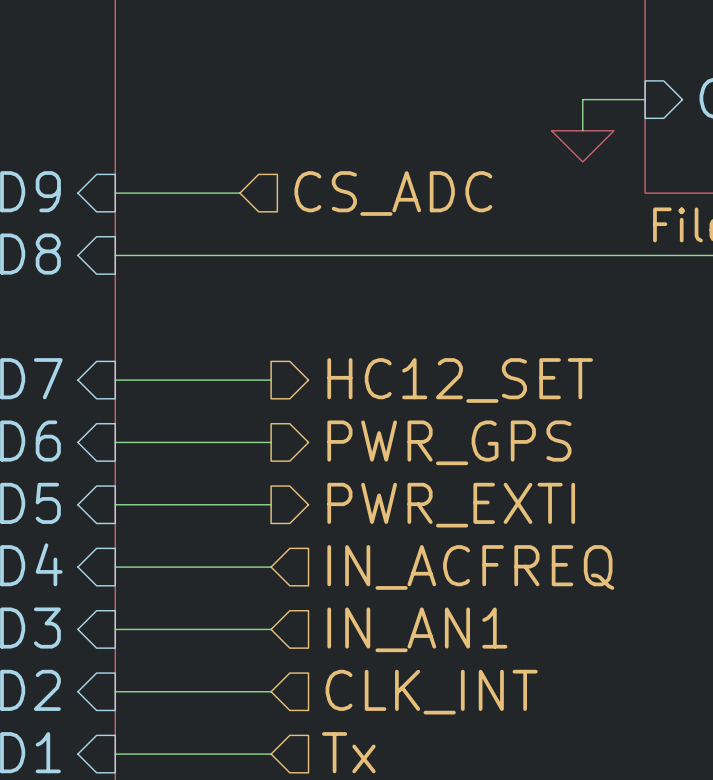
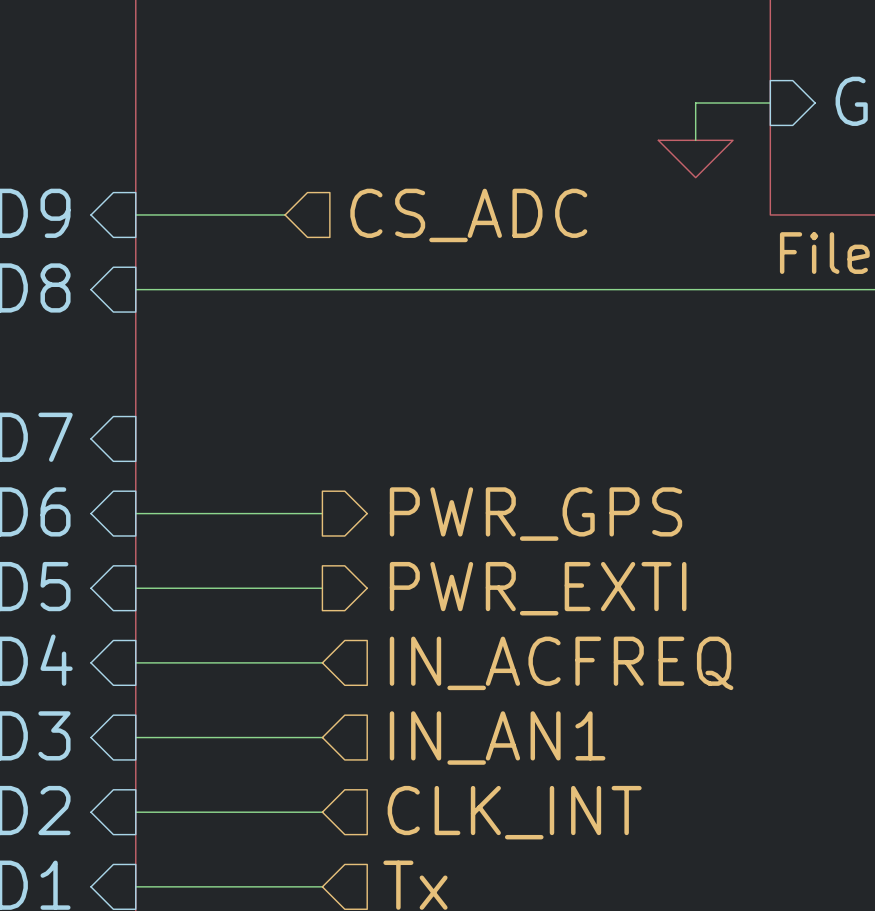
wire: (115, 380) (271, 380) -> none
hierarchical label: HC12_SET (460, 380) -> none

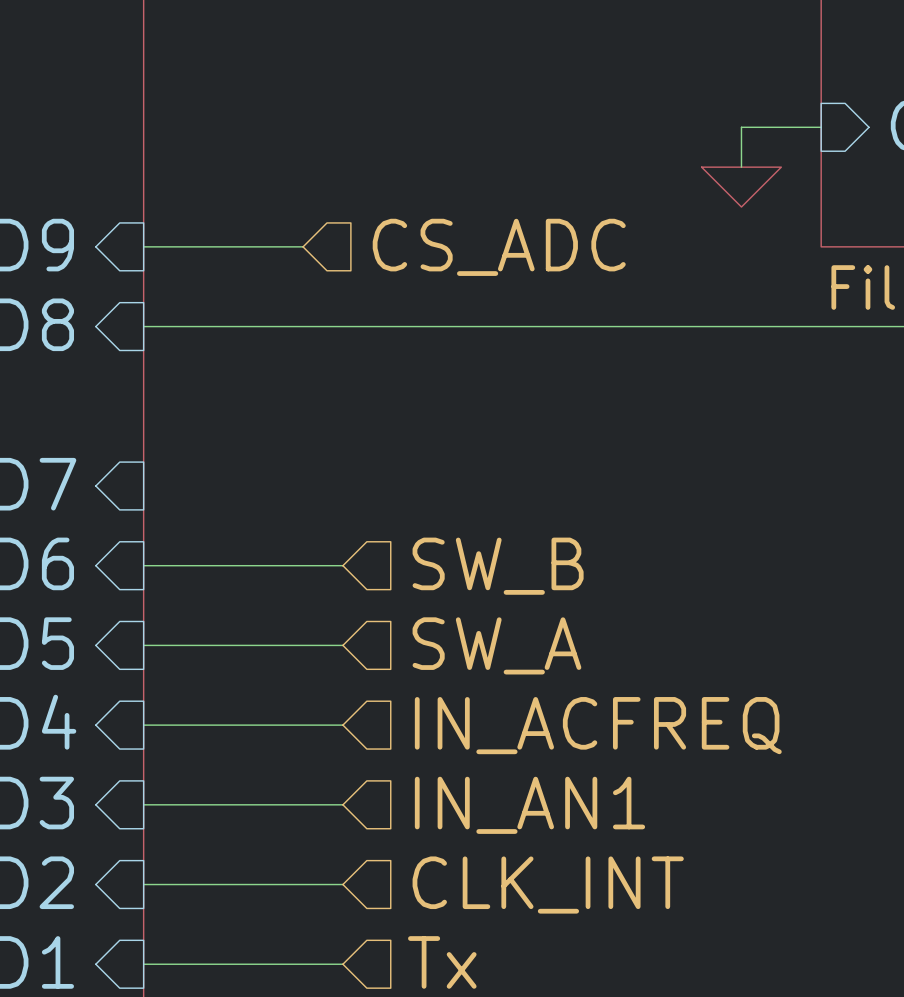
hierarchical label shape: output (535, 514) -> input (498, 566)
hierarchical label: PWR_GPS (535, 514) -> SW_B (498, 566)
hierarchical label shape: output (538, 588) -> input (496, 645)
hierarchical label: PWR_EXTI (538, 588) -> SW_A (496, 645)

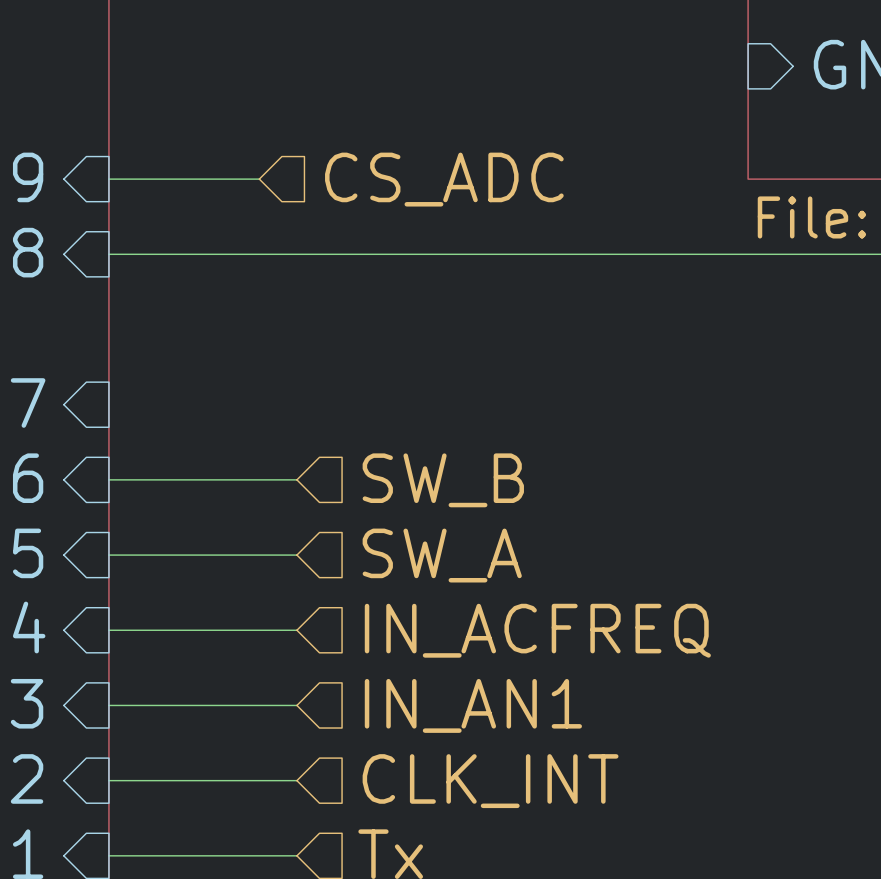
wire: (821, 127) (741, 127) (741, 167) -> none
power symbol: (741, 187) -> none

